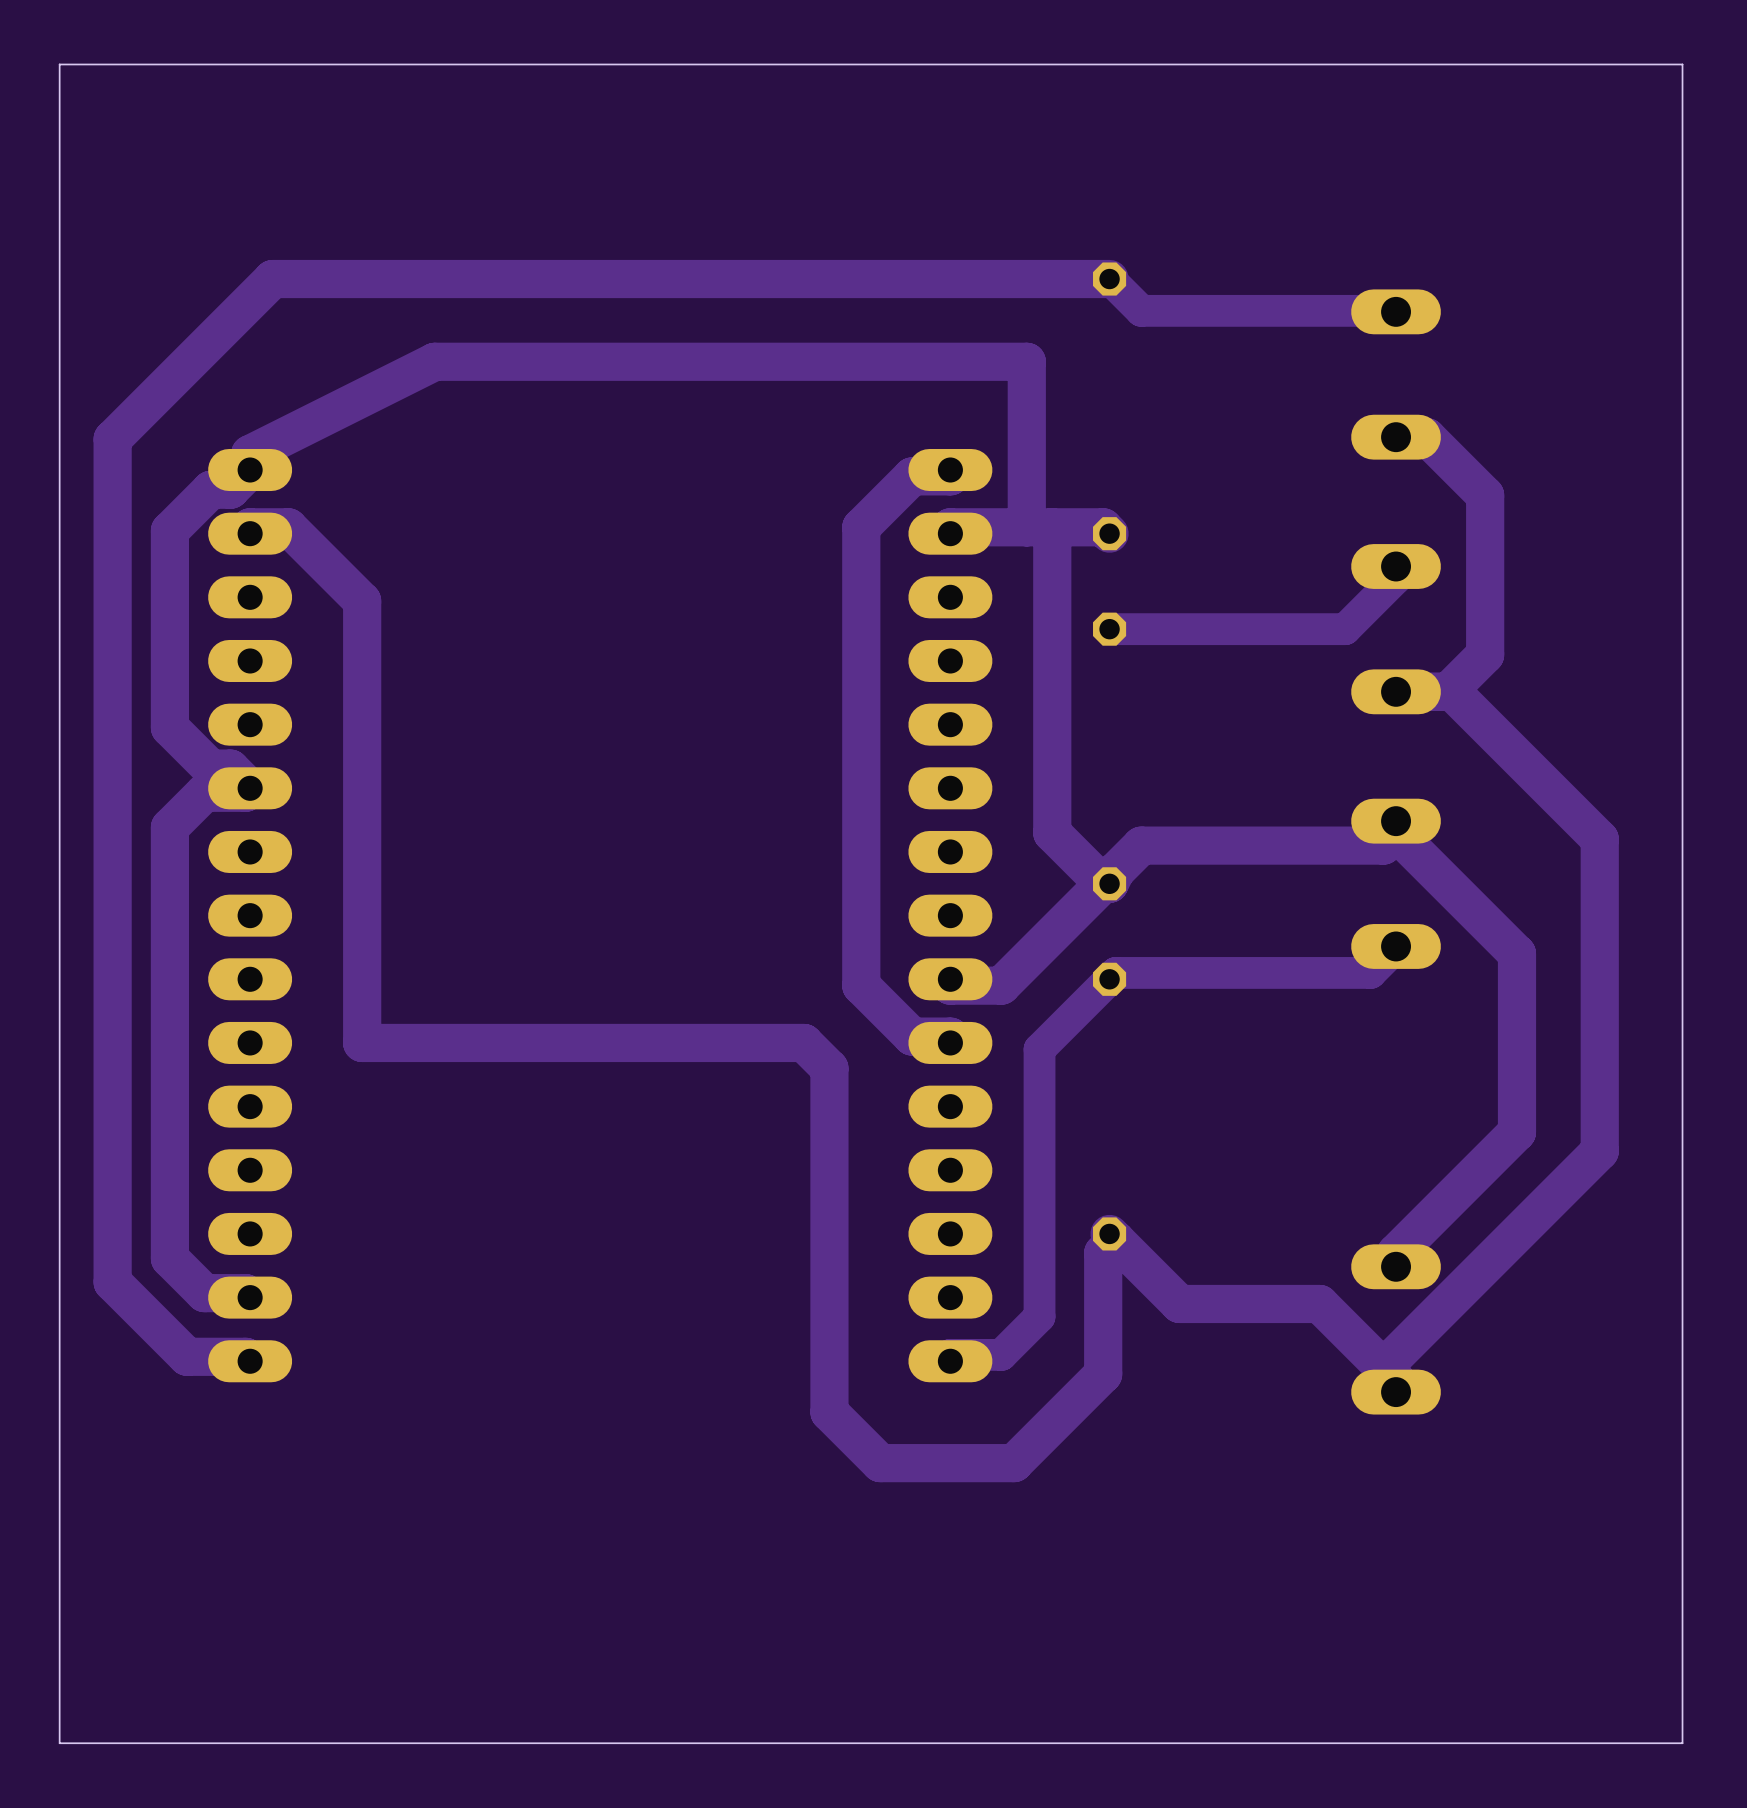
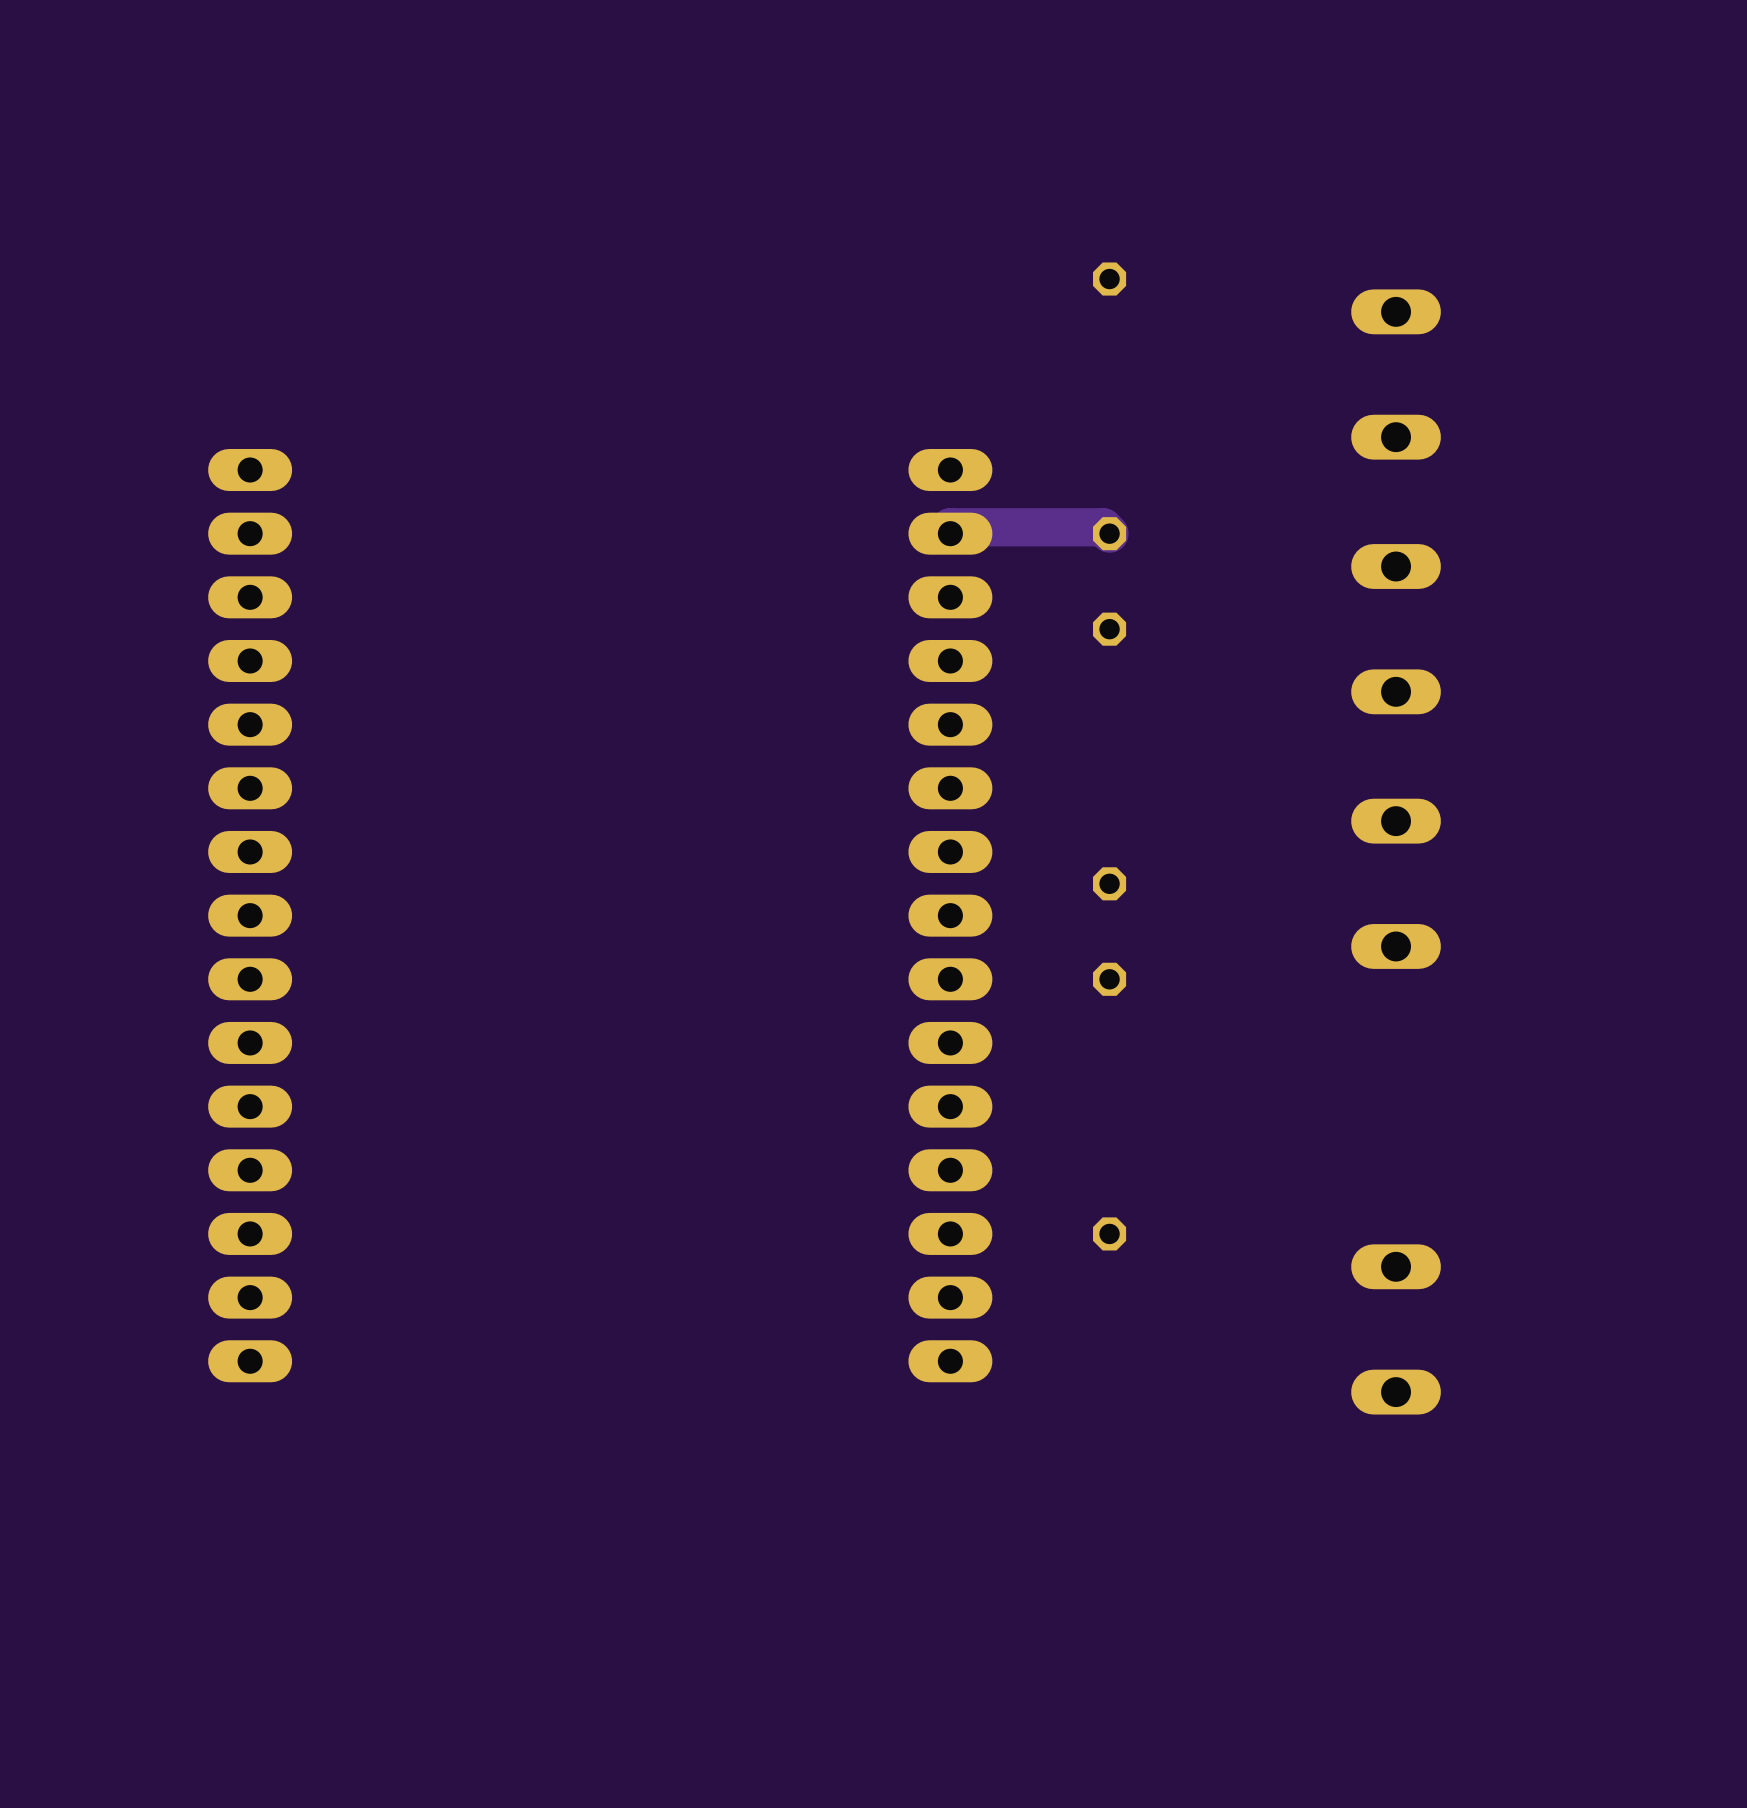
board edge: (1682, 64) (59, 64) (59, 1743) (1682, 1743) (1682, 64) -> none
track: (1396, 311) (1141, 310) (1109, 279) (272, 279) (112, 439) (112, 1282) (187, 1356) (245, 1356) (250, 1361) -> none
track: (1396, 437) (1426, 437) (1485, 495) (1485, 654) (1447, 691) -> none
track: (950, 470) (950, 476) (912, 476) (861, 527) (861, 985) (912, 1036) (950, 1036) (950, 1042) -> none
track: (1026, 527) (1026, 361) (434, 361) (250, 454) (250, 470) (230, 489) (210, 489) (169, 530) (169, 727) (210, 768) (230, 768) (250, 788) (245, 792) (204, 792) (169, 827) (169, 1258) (204, 1293) (245, 1293) (250, 1297) -> none
track: (1052, 527) (1052, 832) (1103, 883) -> none
track: (250, 533) (250, 527) (288, 527) (362, 601) (362, 1042) (803, 1042) (829, 1068) (829, 1412) (880, 1463) (1014, 1463) (1103, 1374) (1103, 1253) (1115, 1240) -> none
track: (1396, 566) (1396, 578) (1345, 629) (1109, 629) -> none
track: (1396, 691) (1452, 691) (1599, 839) (1599, 1151) (1383, 1367) -> none
track: (1396, 832) (1516, 953) (1516, 1132) (1396, 1253) (1396, 1266) -> none
track: (1396, 832) (1383, 845) (1141, 845) (1115, 871) (1109, 883) (1103, 883) -> none
track: (1103, 883) (1001, 985) (950, 985) (950, 979) -> none
track: (1396, 946) (1370, 972) (1115, 972) (1039, 1049) (1039, 1316) (1001, 1354) (950, 1354) (950, 1361) -> none
track: (1109, 1233) (1179, 1303) (1319, 1303) (1396, 1380) (1396, 1392) -> none

